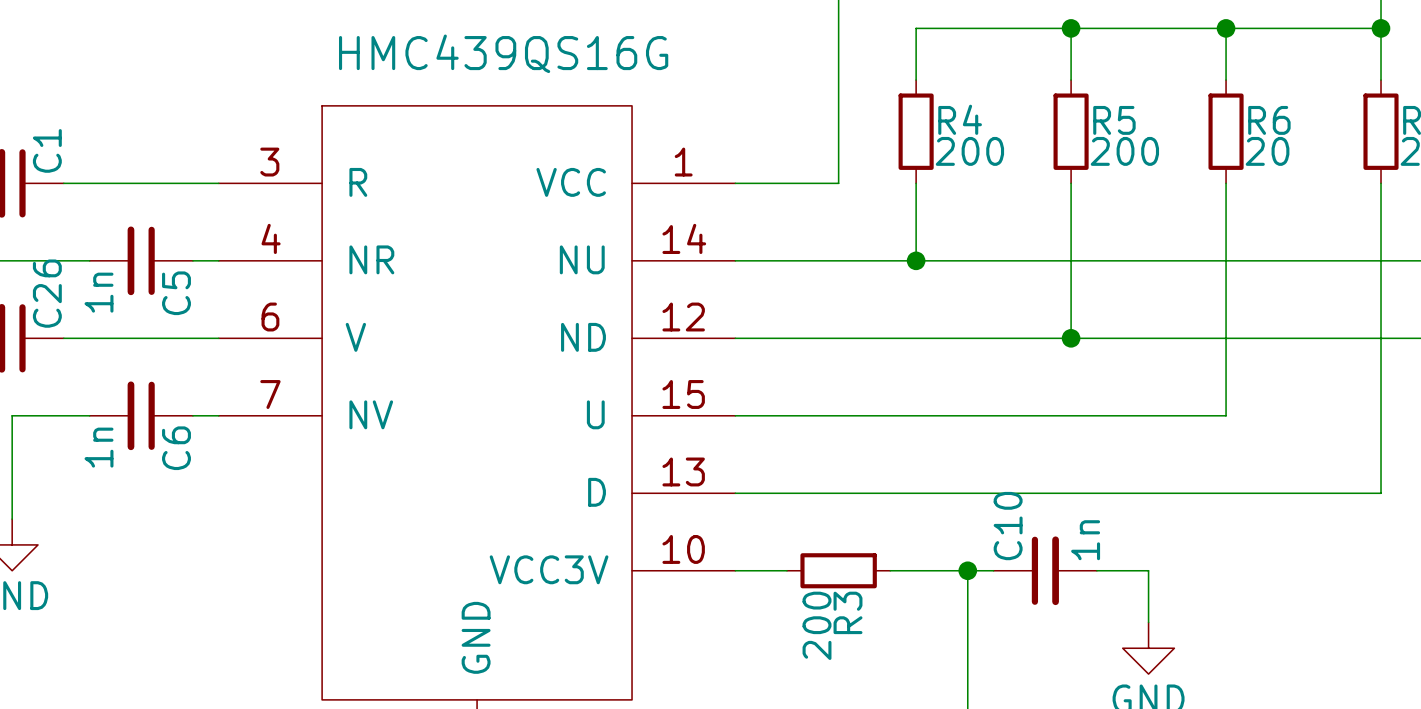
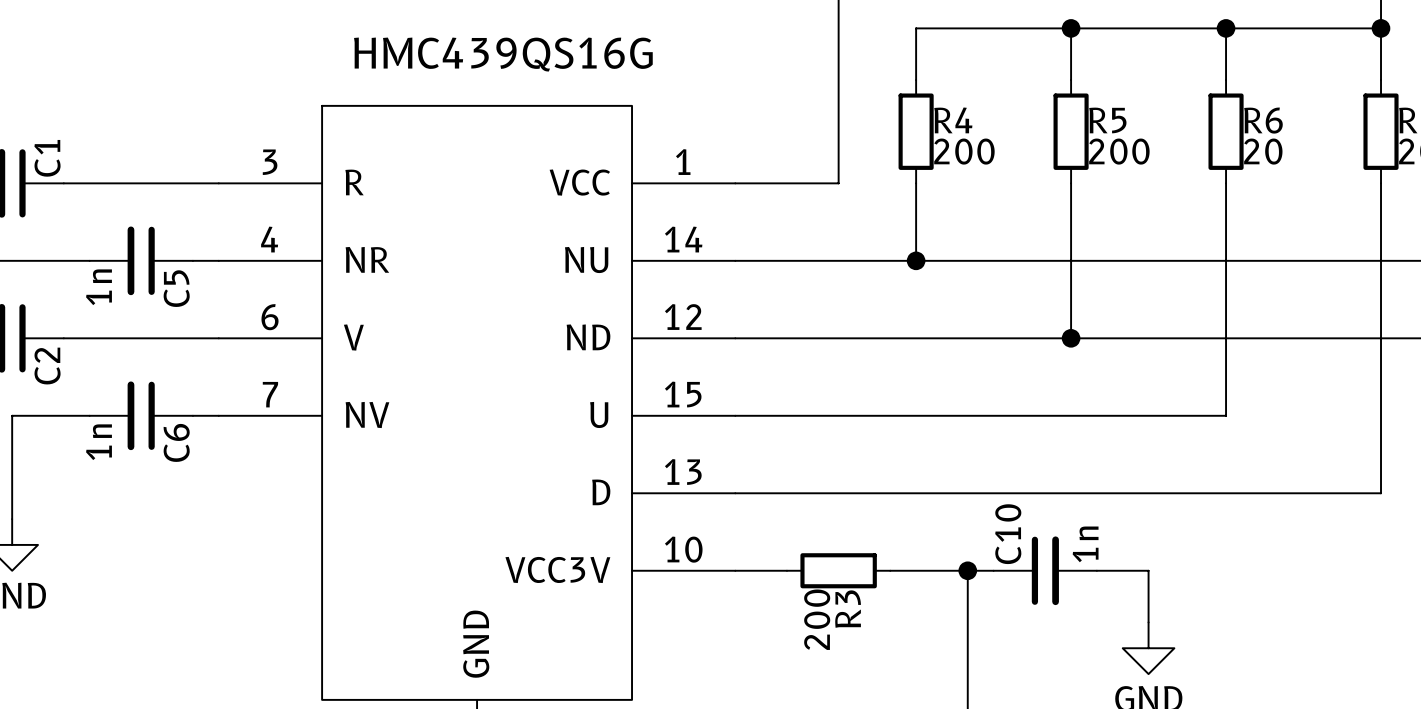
C26 name: C26 (47, 293) -> C2 (47, 366)

